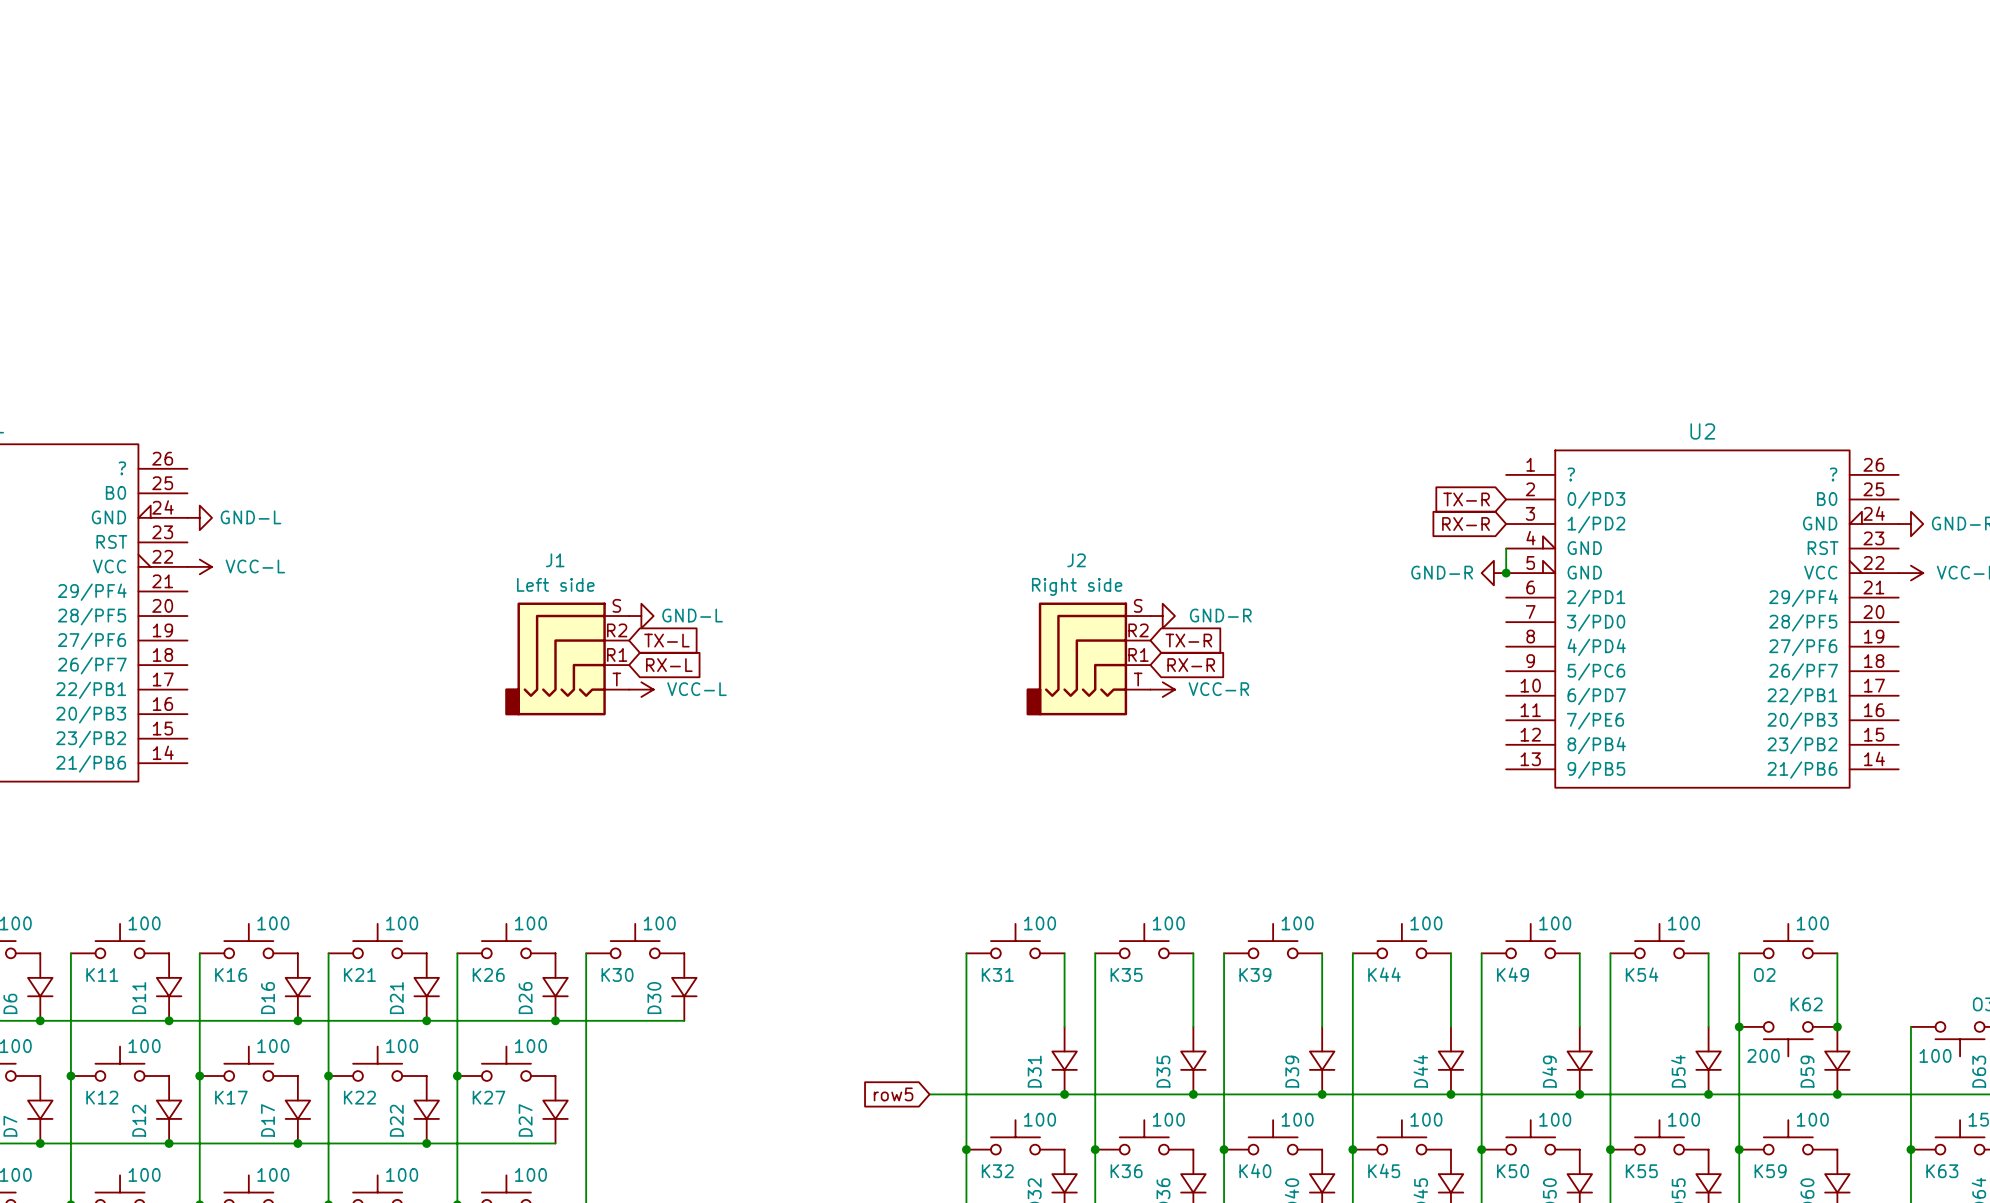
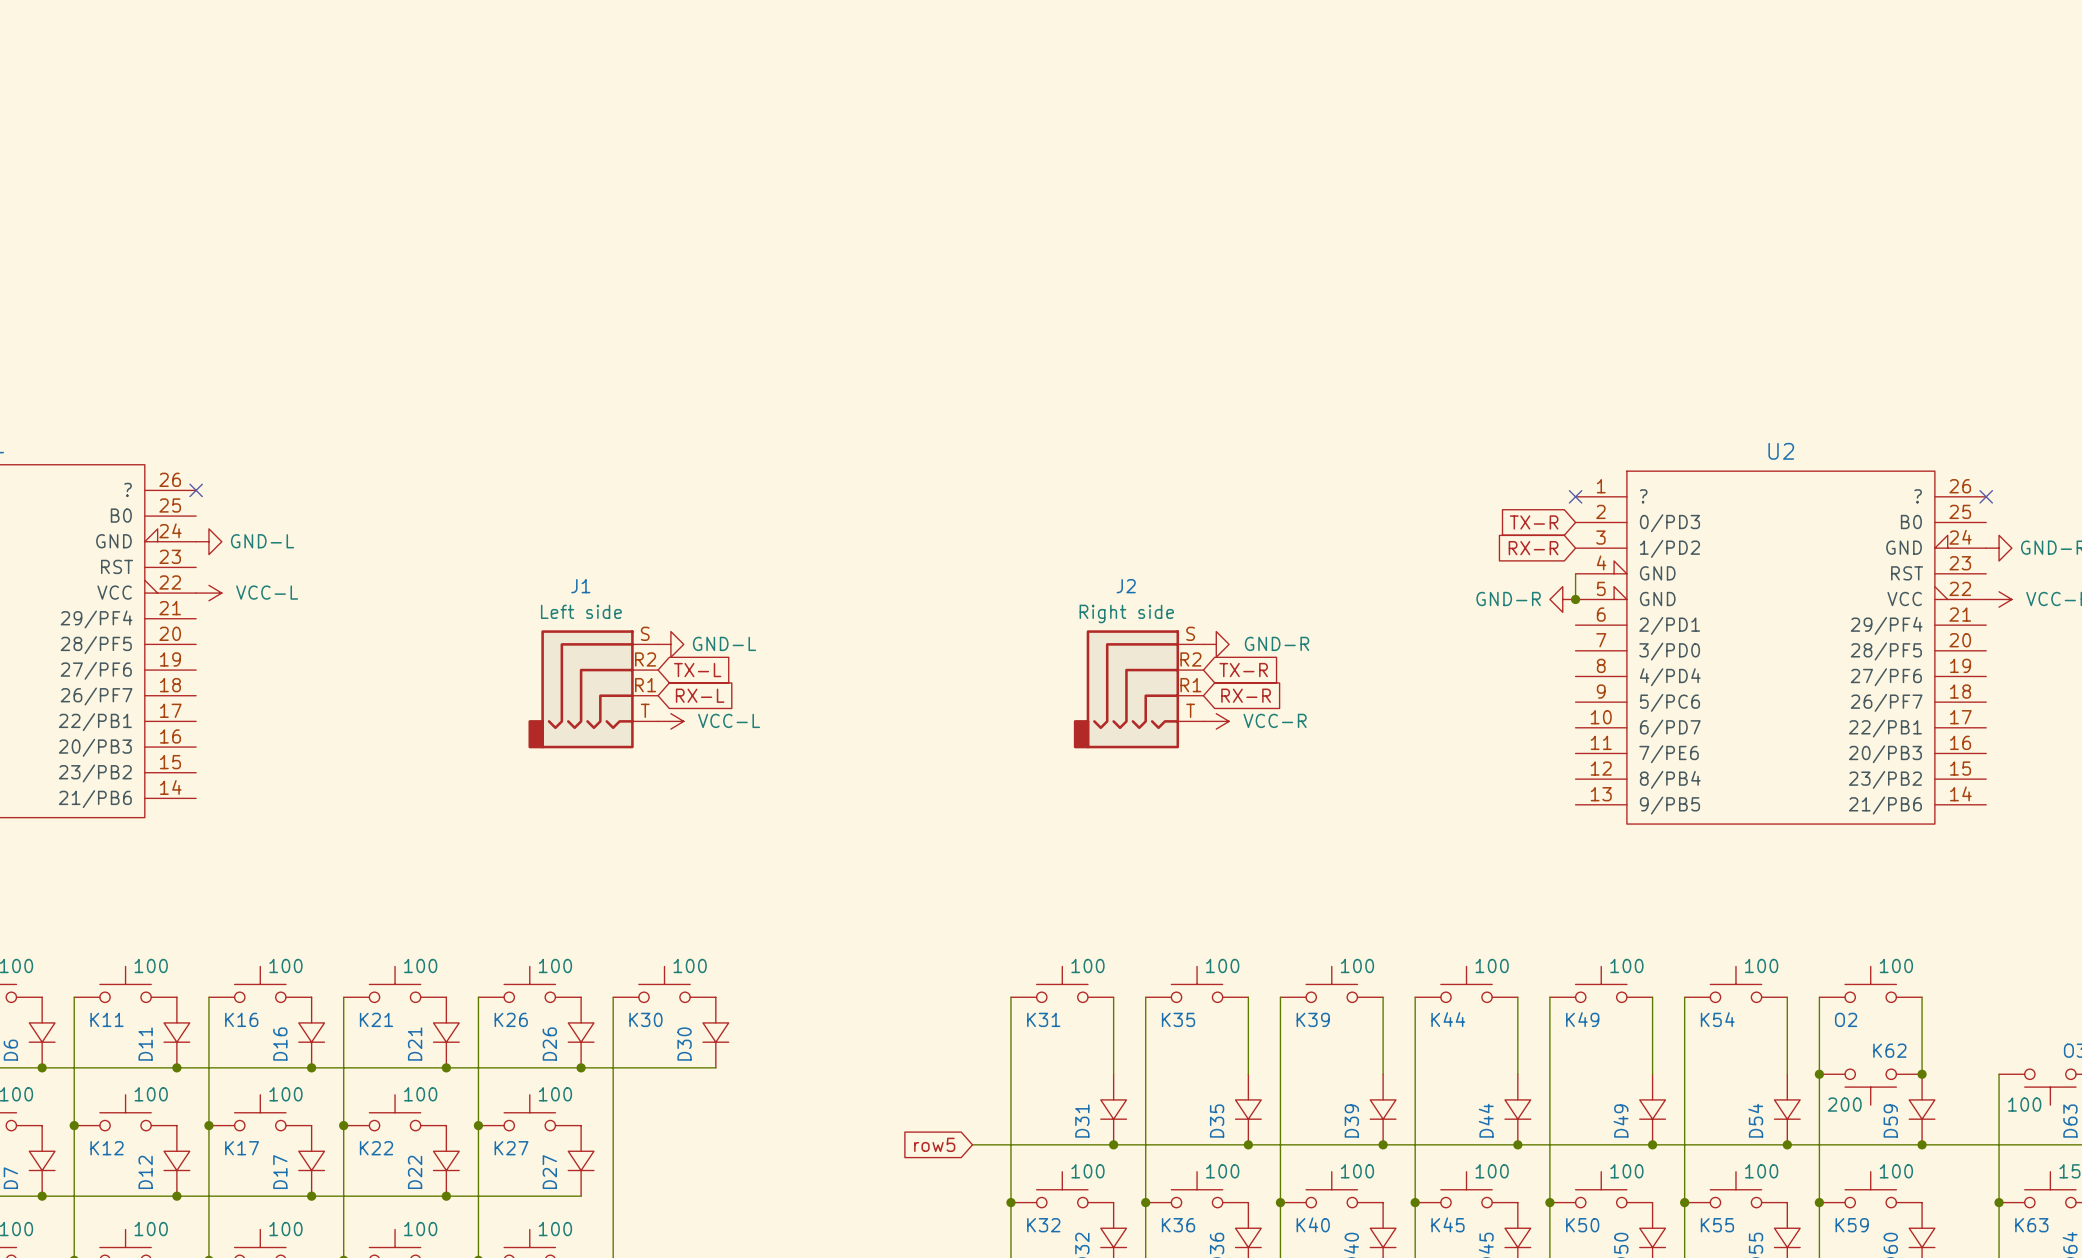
no-connect mark: none -> (196, 490)
no-connect mark: none -> (1575, 496)
no-connect mark: none -> (1986, 496)

